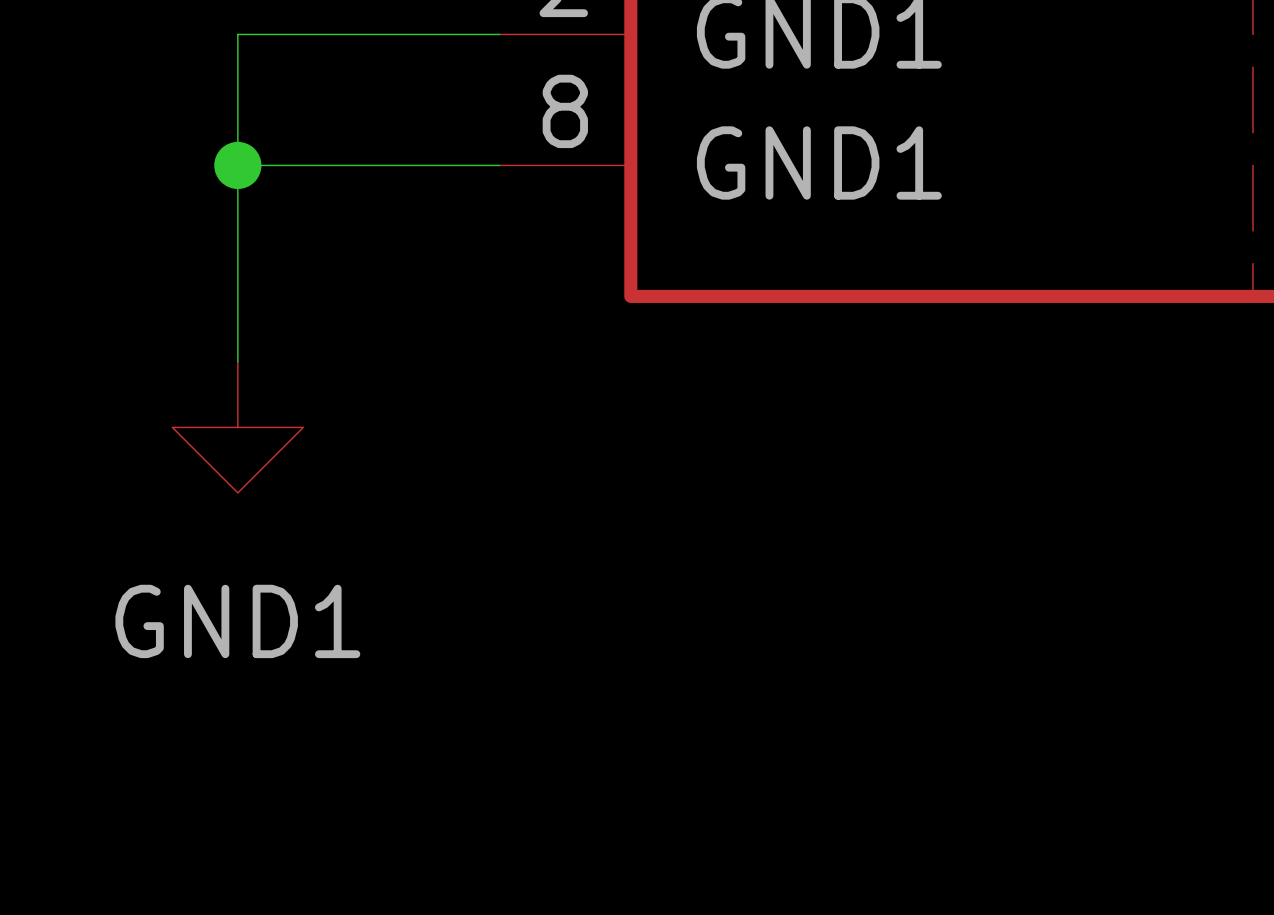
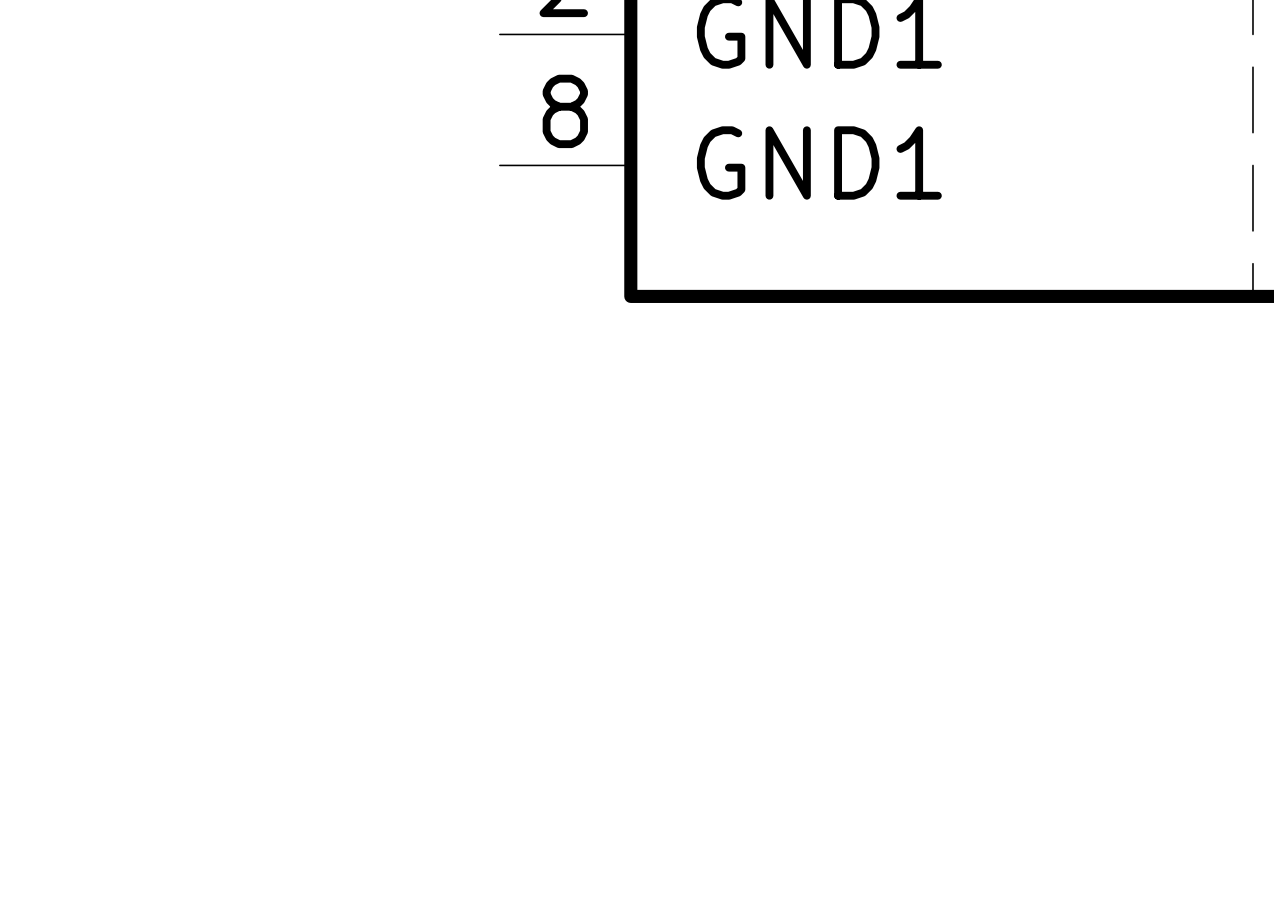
wire: (499, 34) (237, 34) (237, 361) -> none
wire: (237, 165) (499, 165) -> none
junction: (237, 165) -> none
power symbol: GND1 (237, 427) -> none

